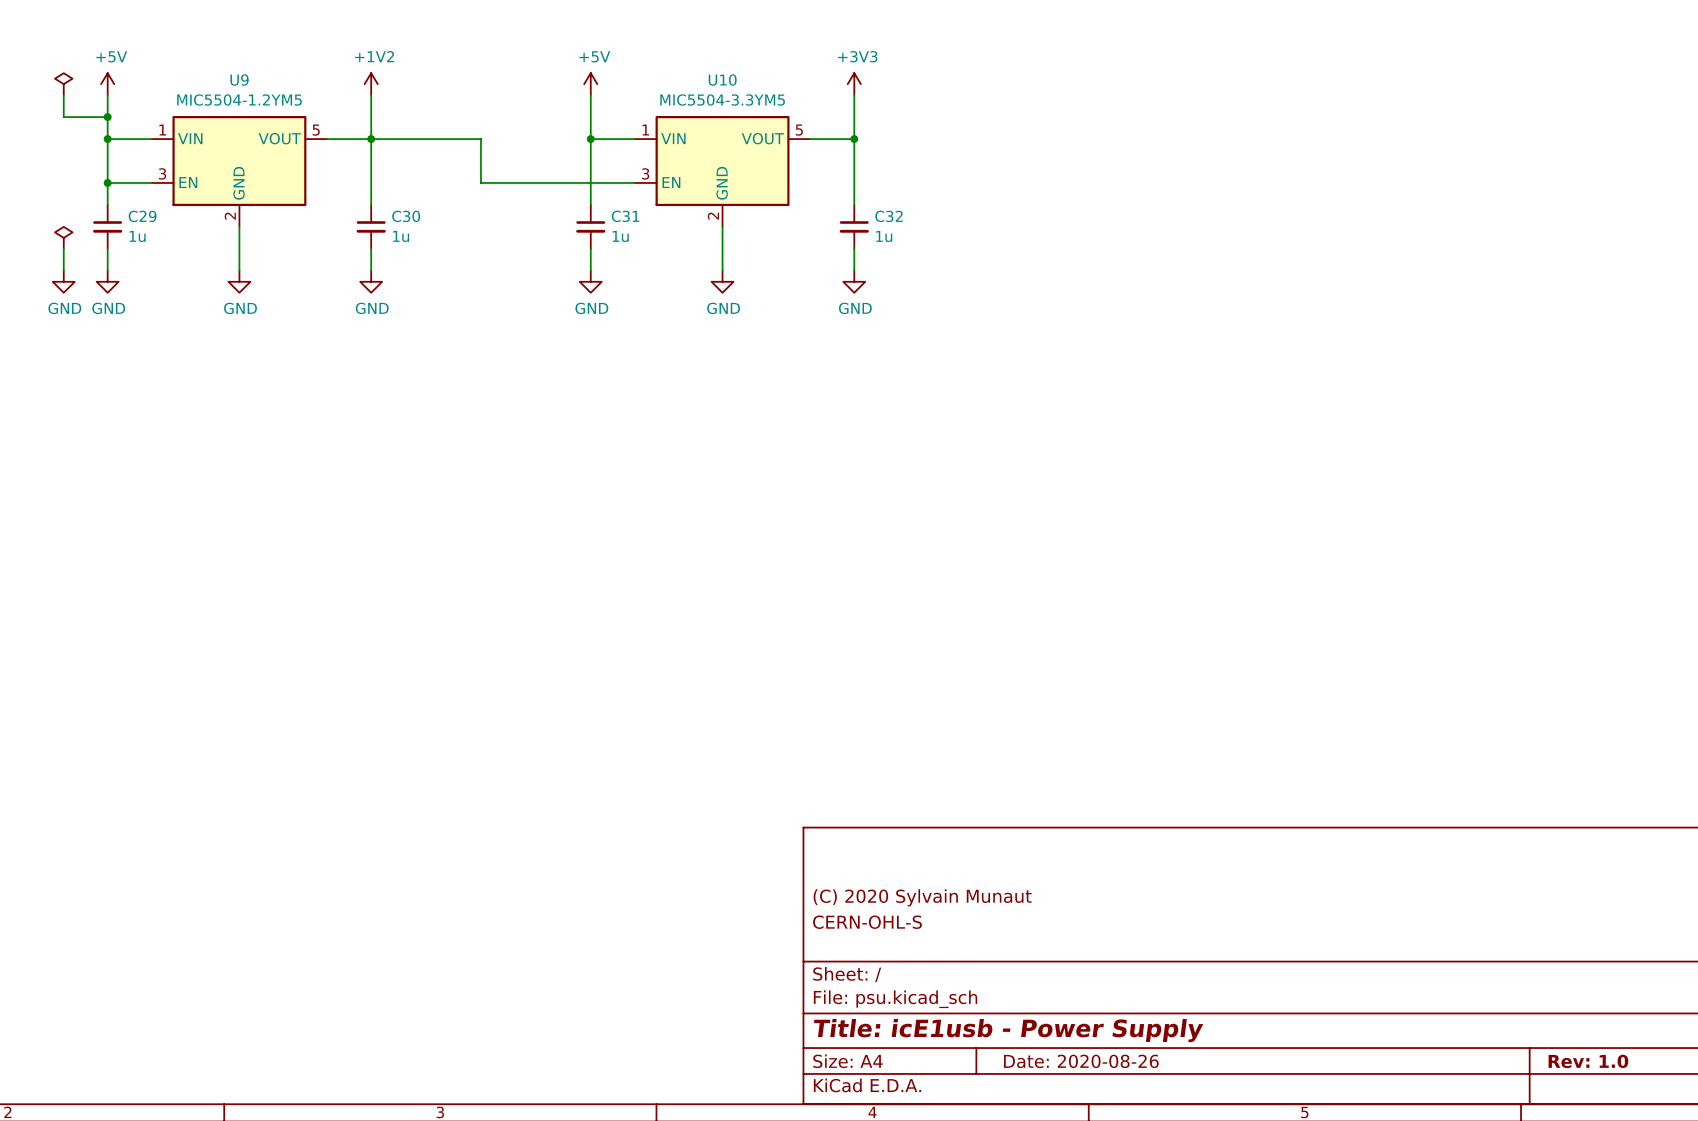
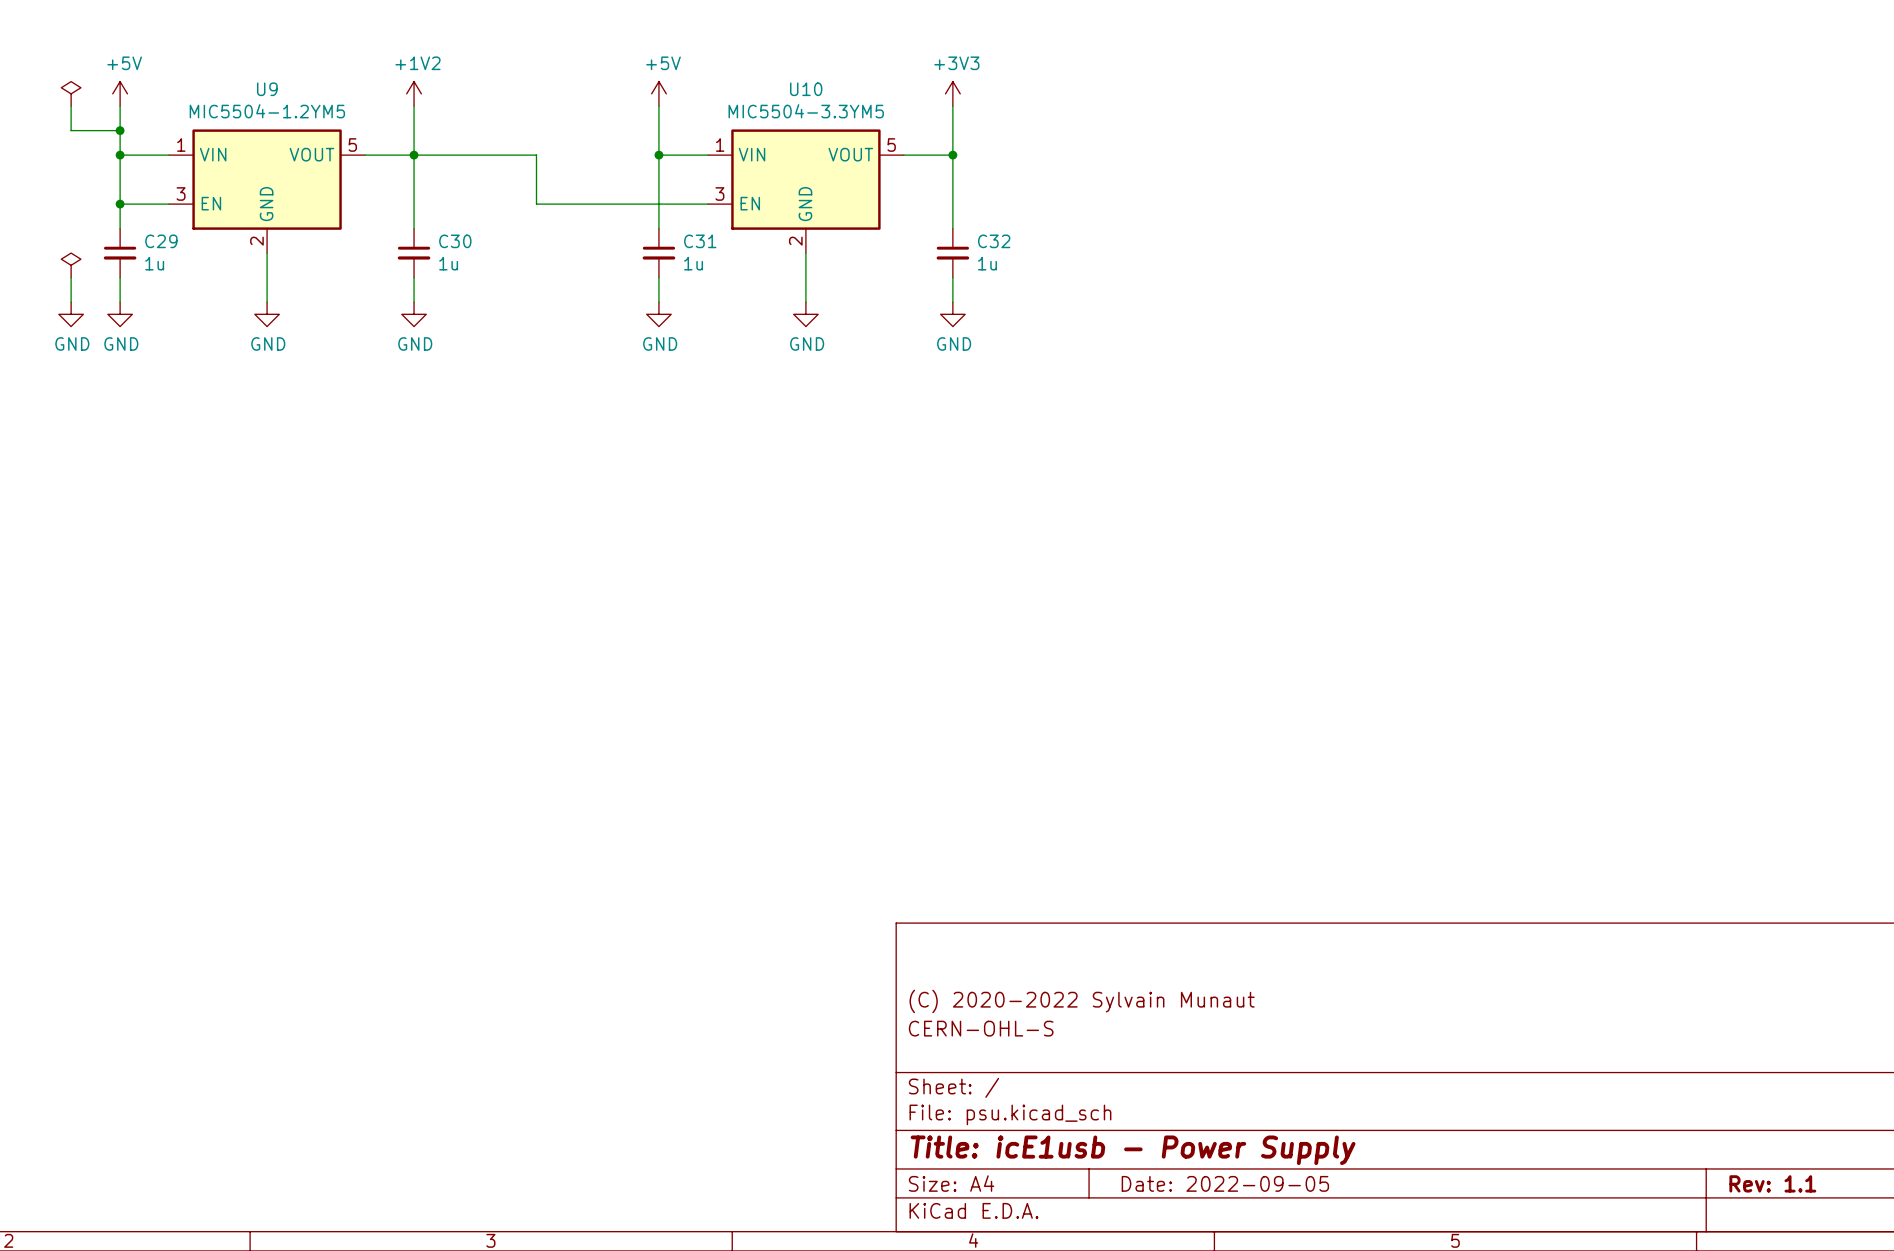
title block: (C) 2020 Sylvain Munaut (922, 897) -> (C) 2020-2022 Sylvain Munaut (1082, 1001)
title block: Date: 2020-08-26 (1081, 1061) -> Date: 2022-09-05 (1225, 1183)
title block: Rev: 1.0 (1588, 1061) -> Rev: 1.1 (1772, 1183)

